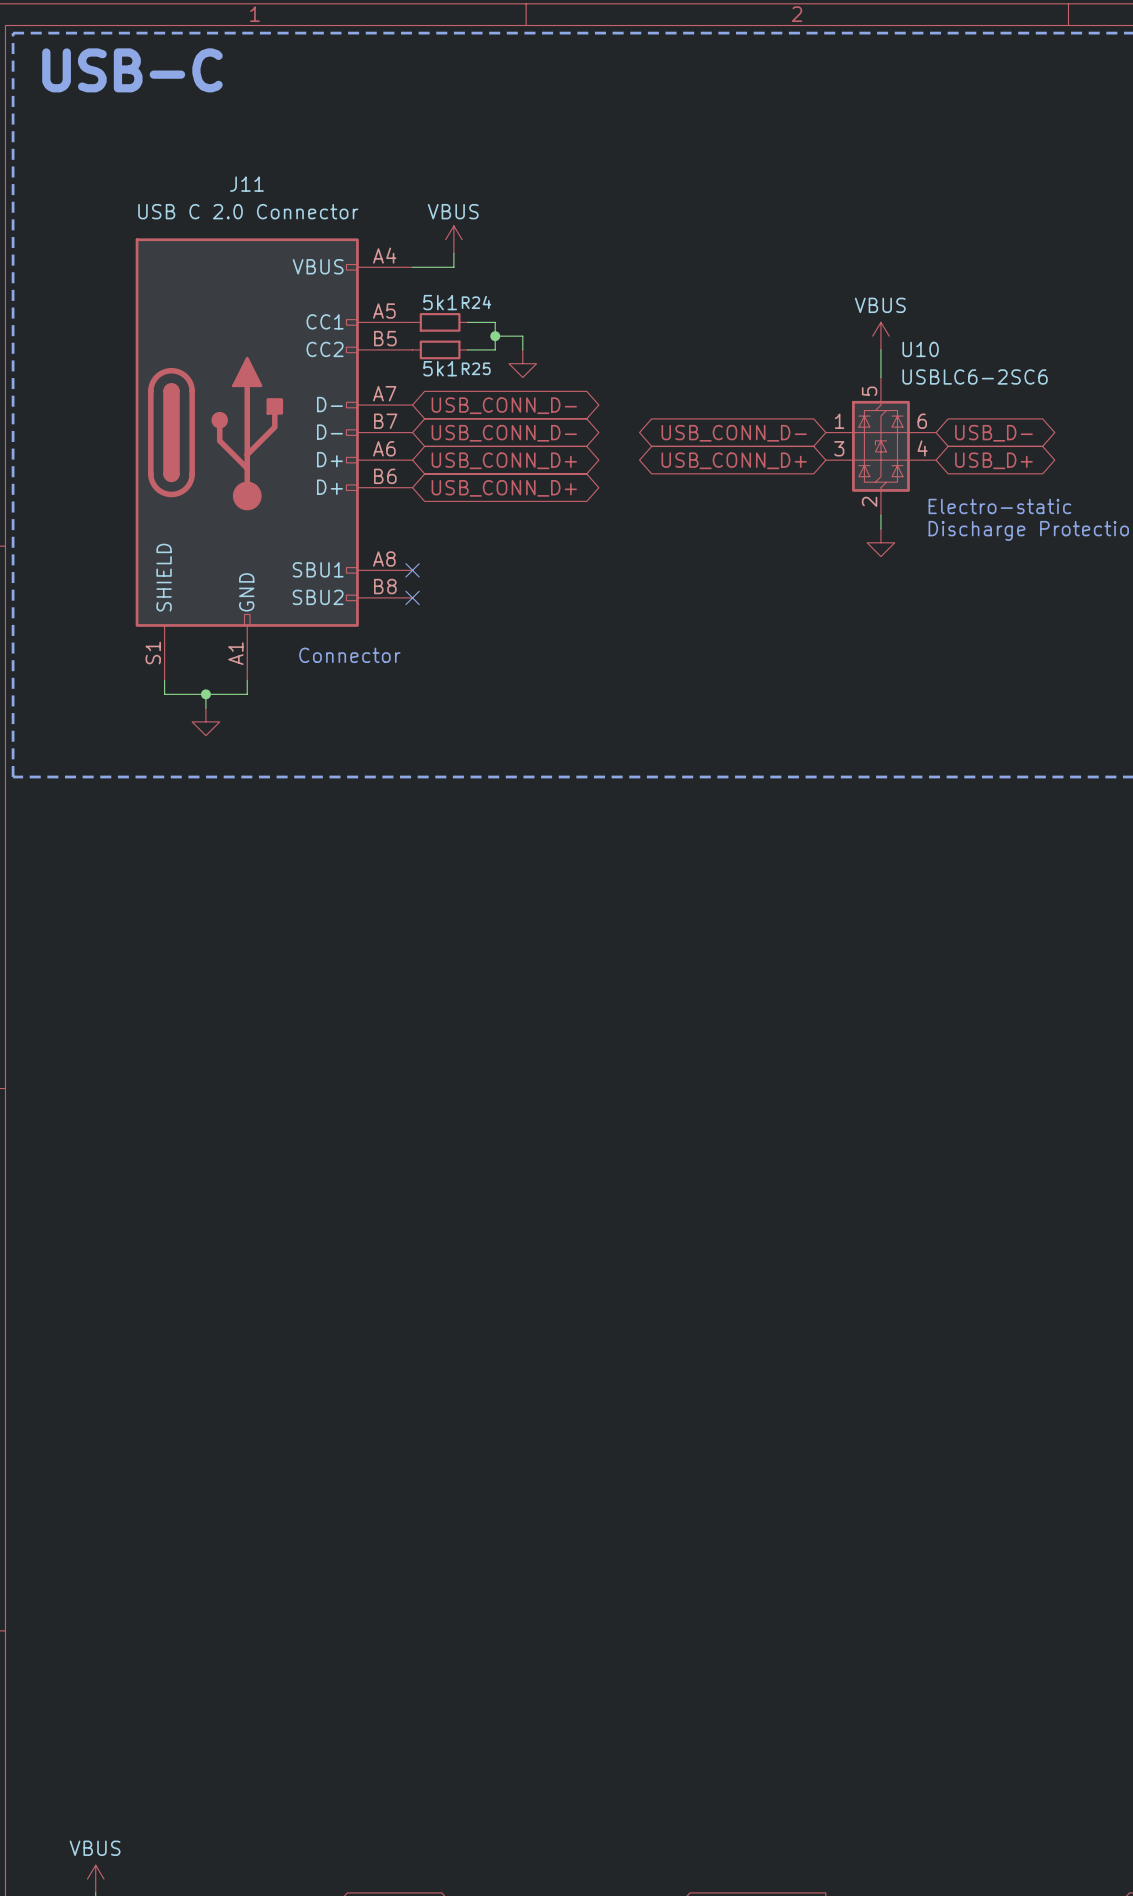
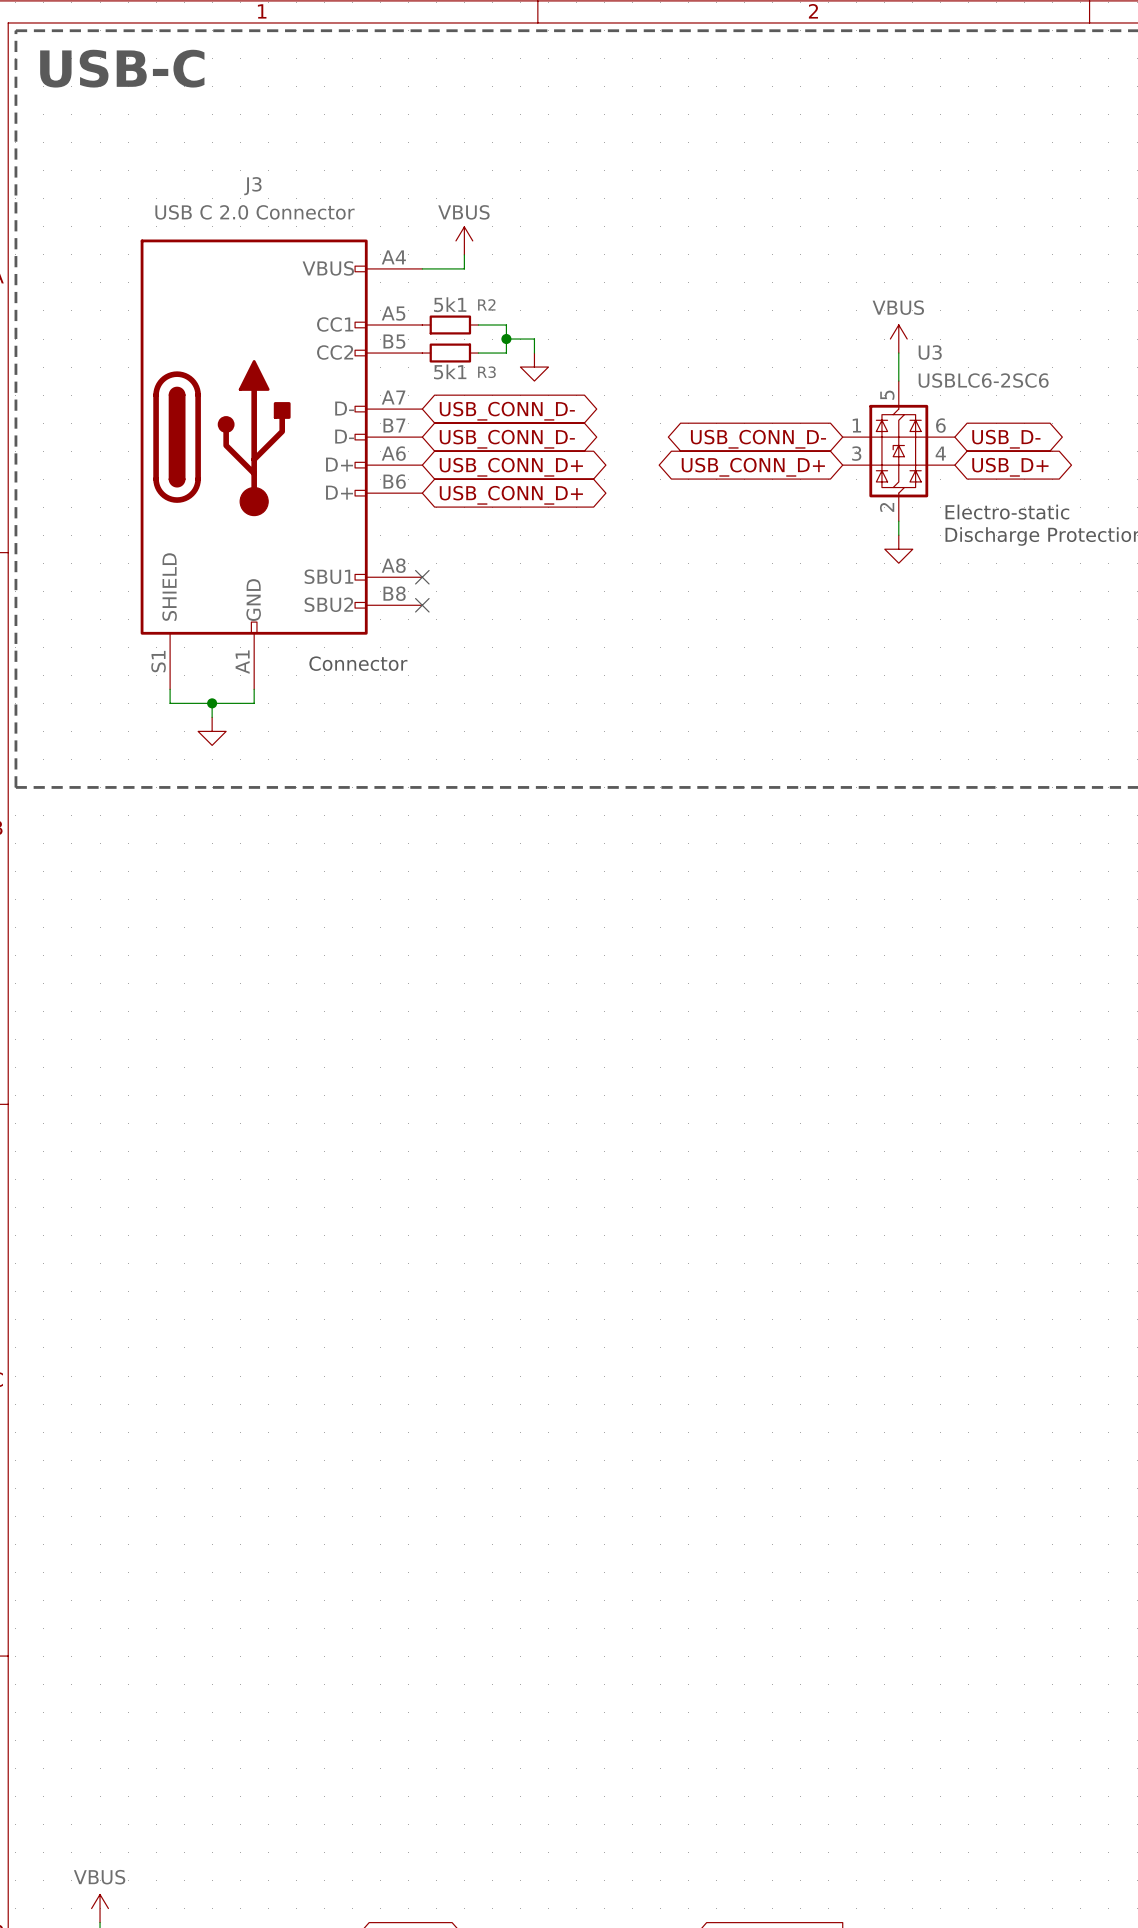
J11 name: J11 (246, 184) -> J3 (252, 186)
R24 name: R24 (476, 302) -> R2 (486, 304)
U10 name: U10 (920, 349) -> U3 (930, 352)
R25 name: R25 (476, 368) -> R3 (486, 372)

